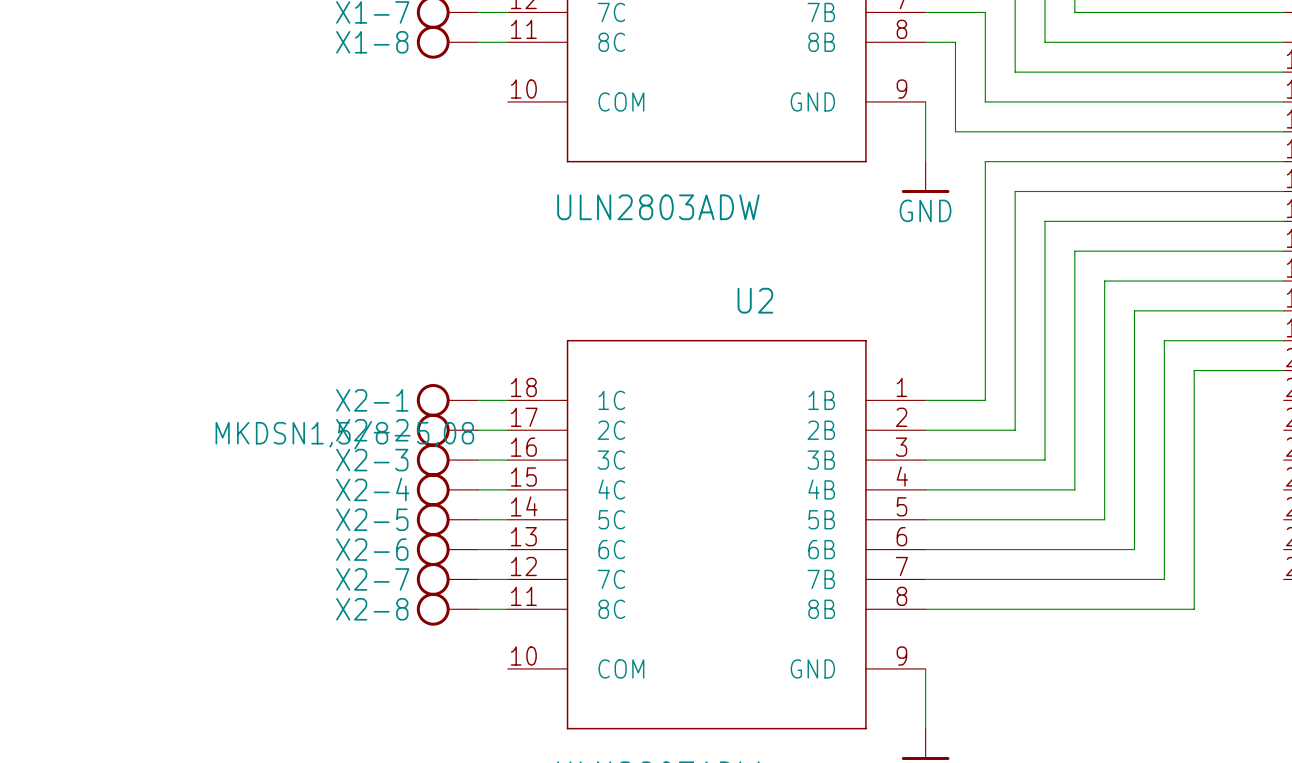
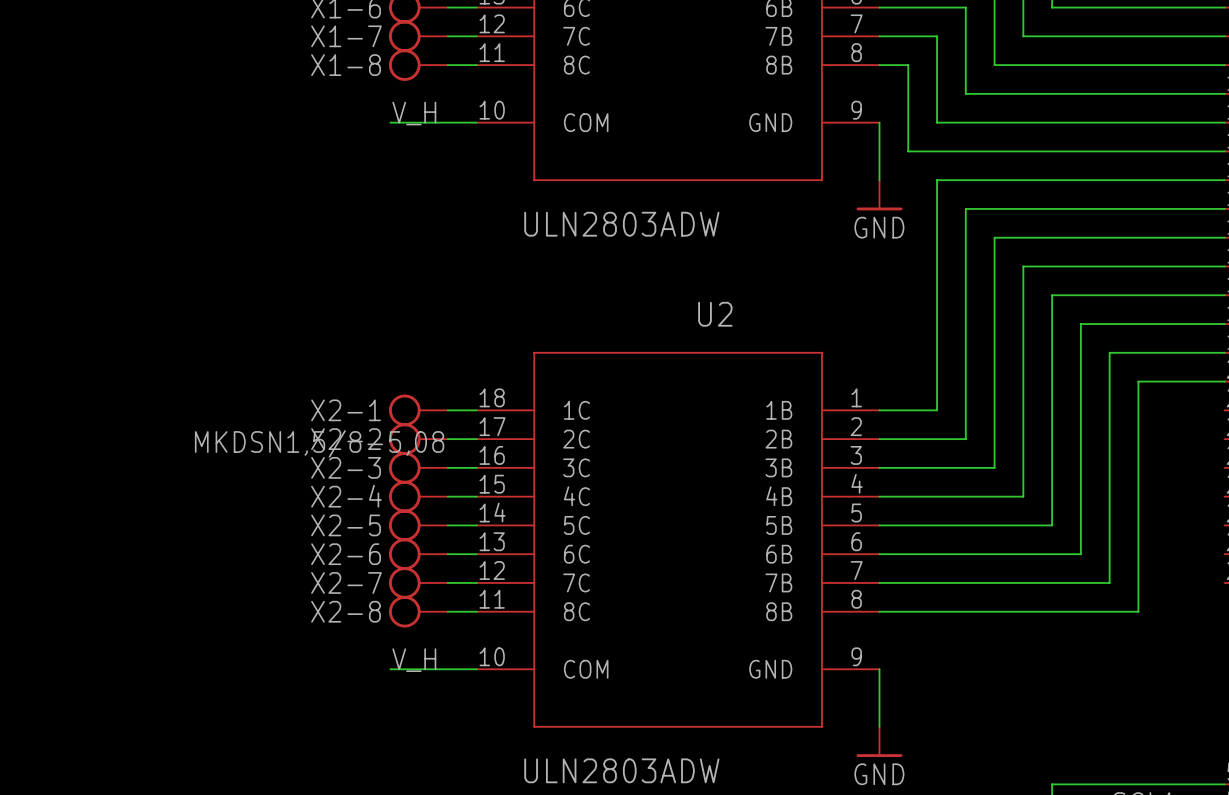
label: none -> V_H (414, 113)
wire: none -> (390, 122) (476, 122)
label: none -> V_H (414, 660)
wire: none -> (390, 669) (476, 669)

